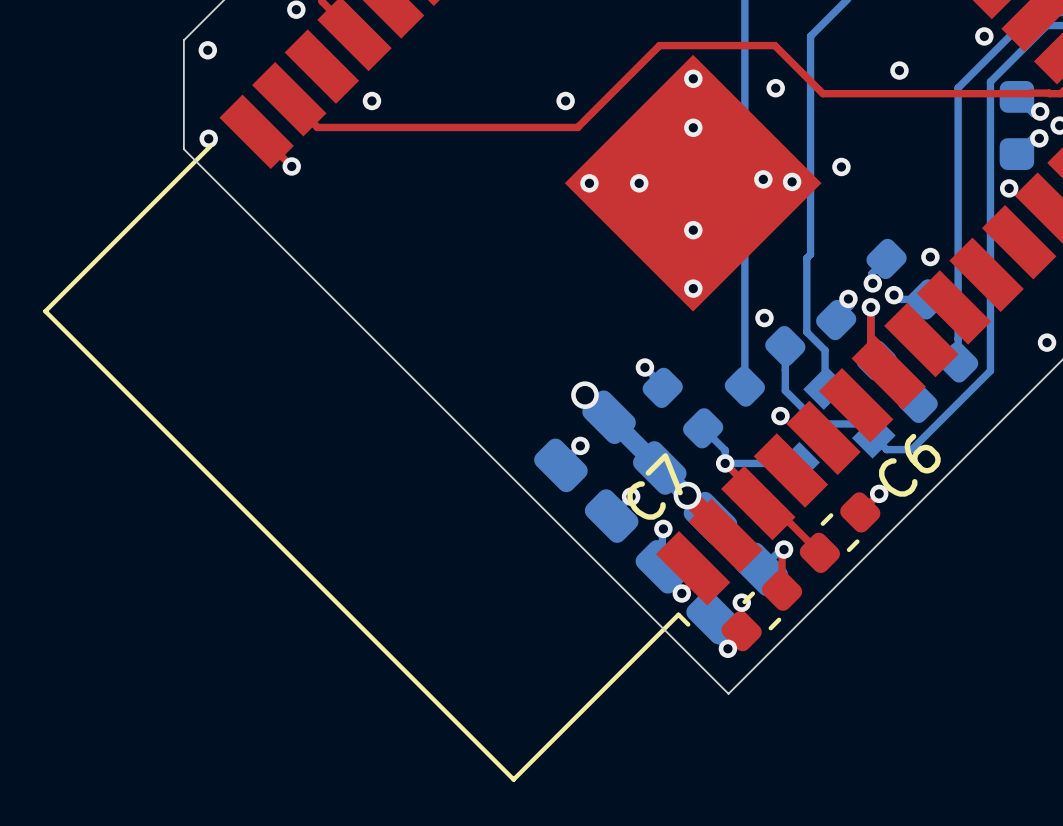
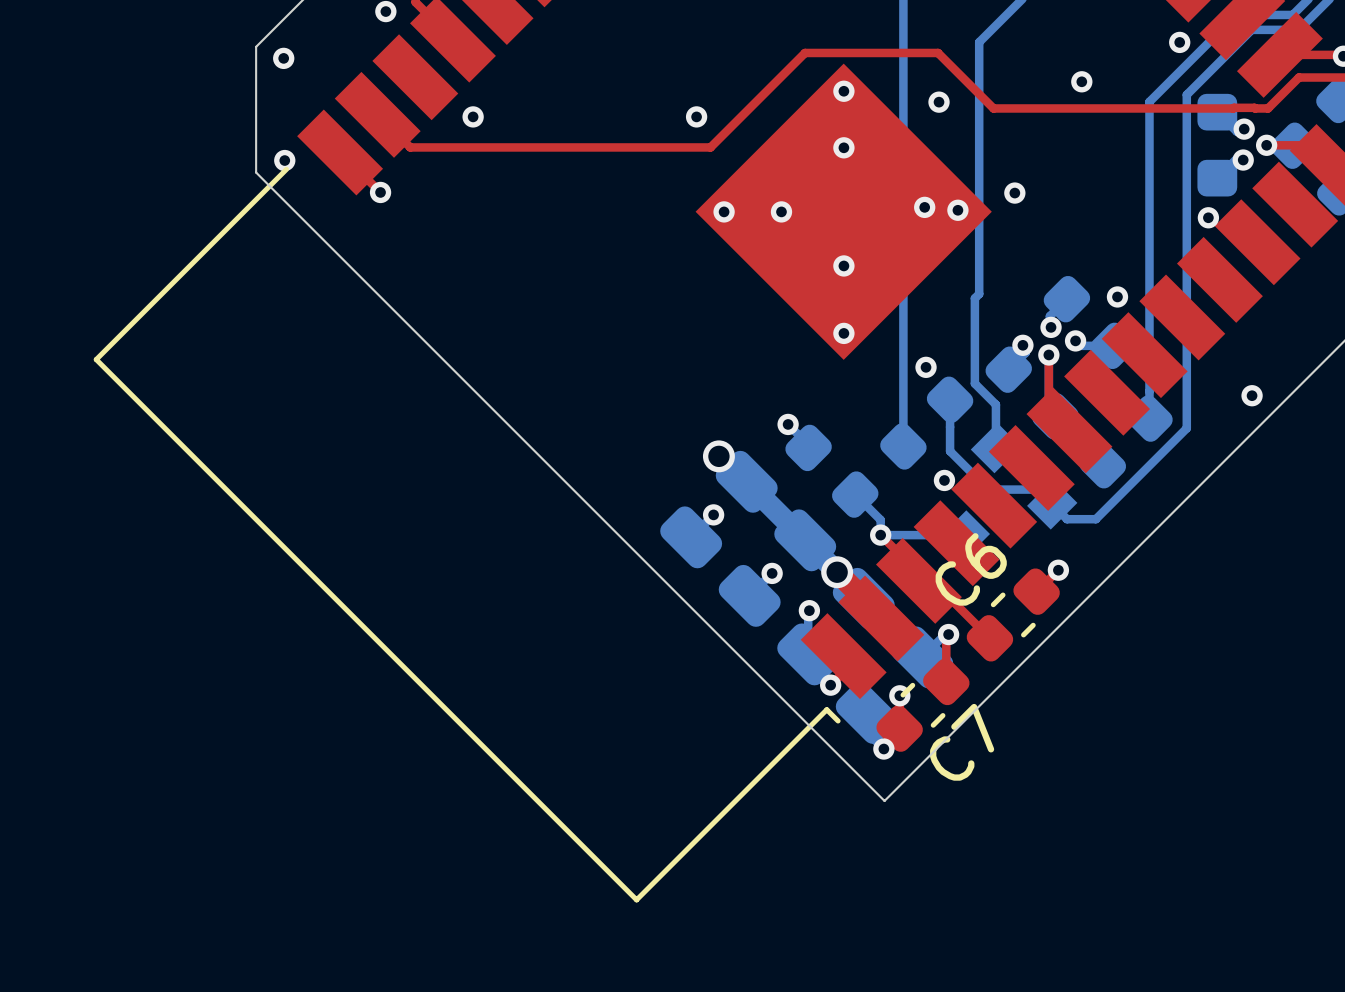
C6 name position: C6 (909, 465) -> C6 (971, 569)
C7 name position: C7 (655, 486) -> C7 (962, 742)

